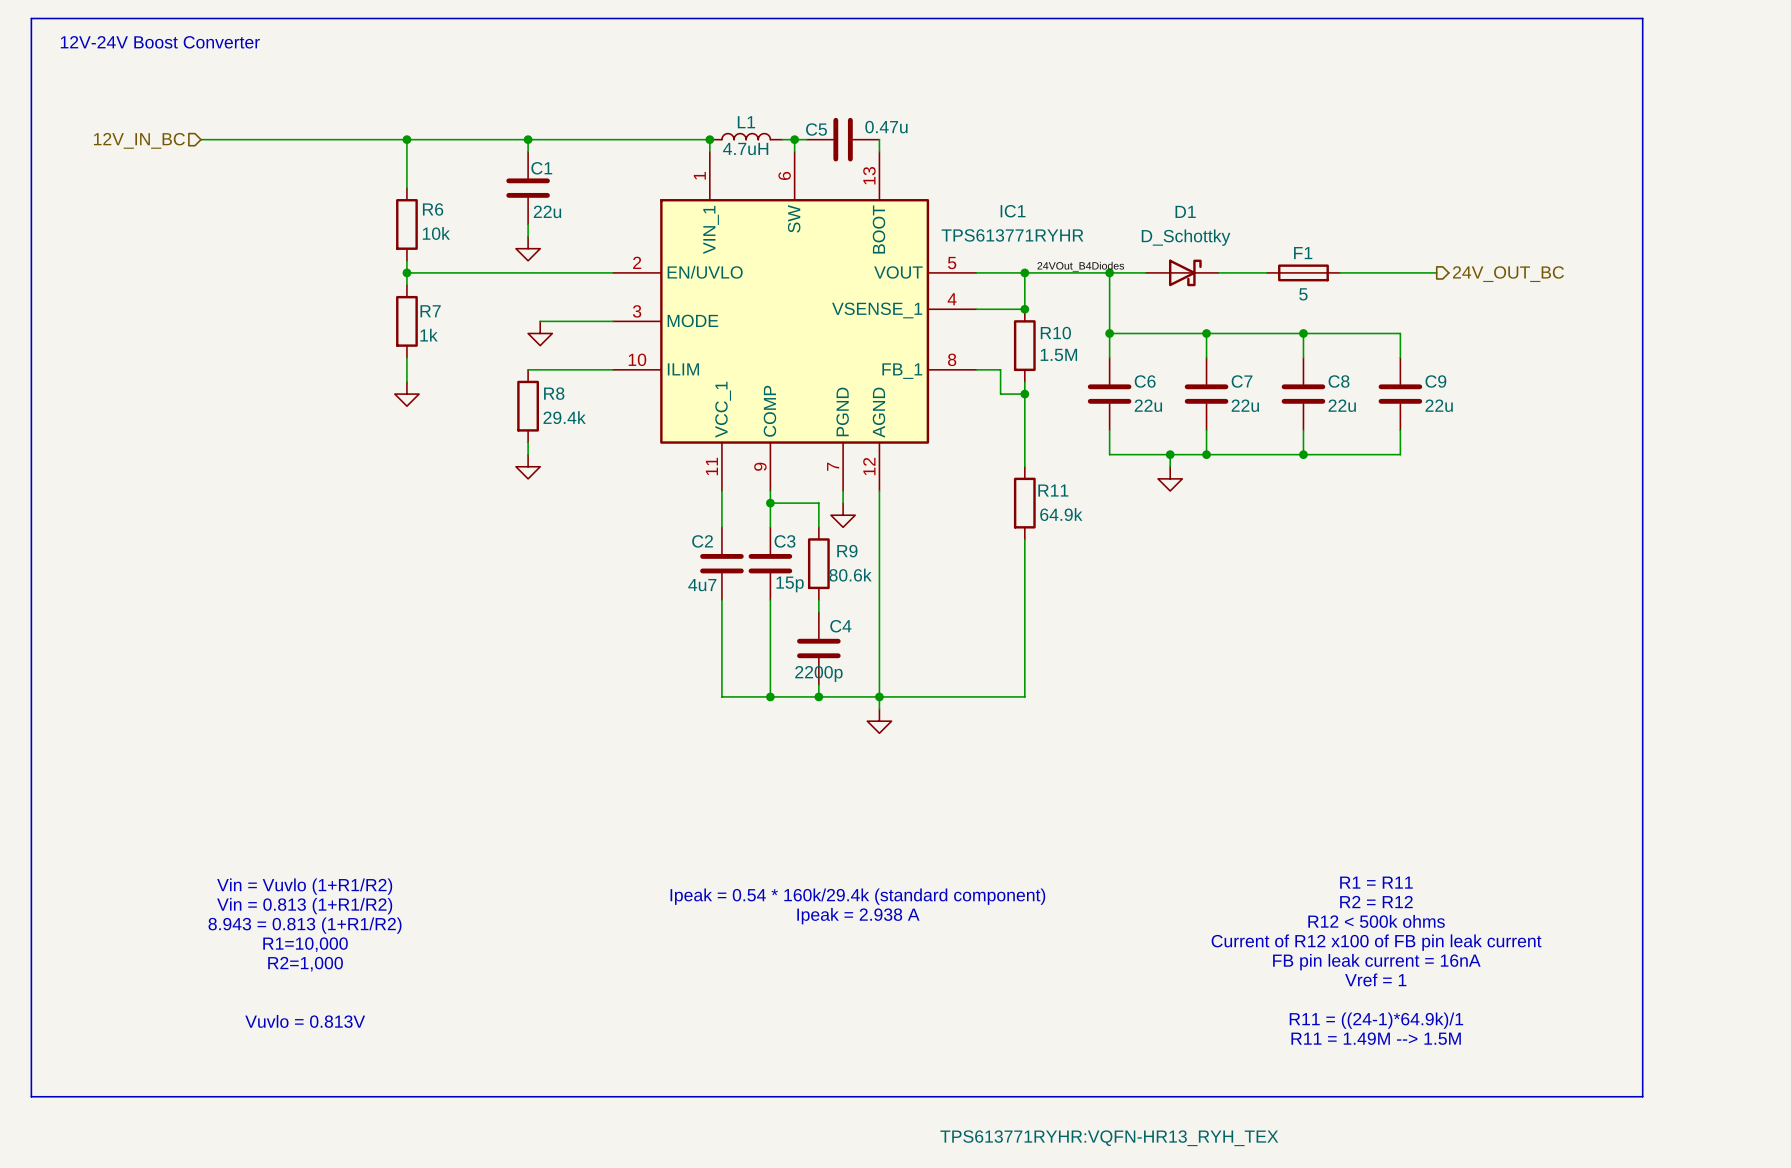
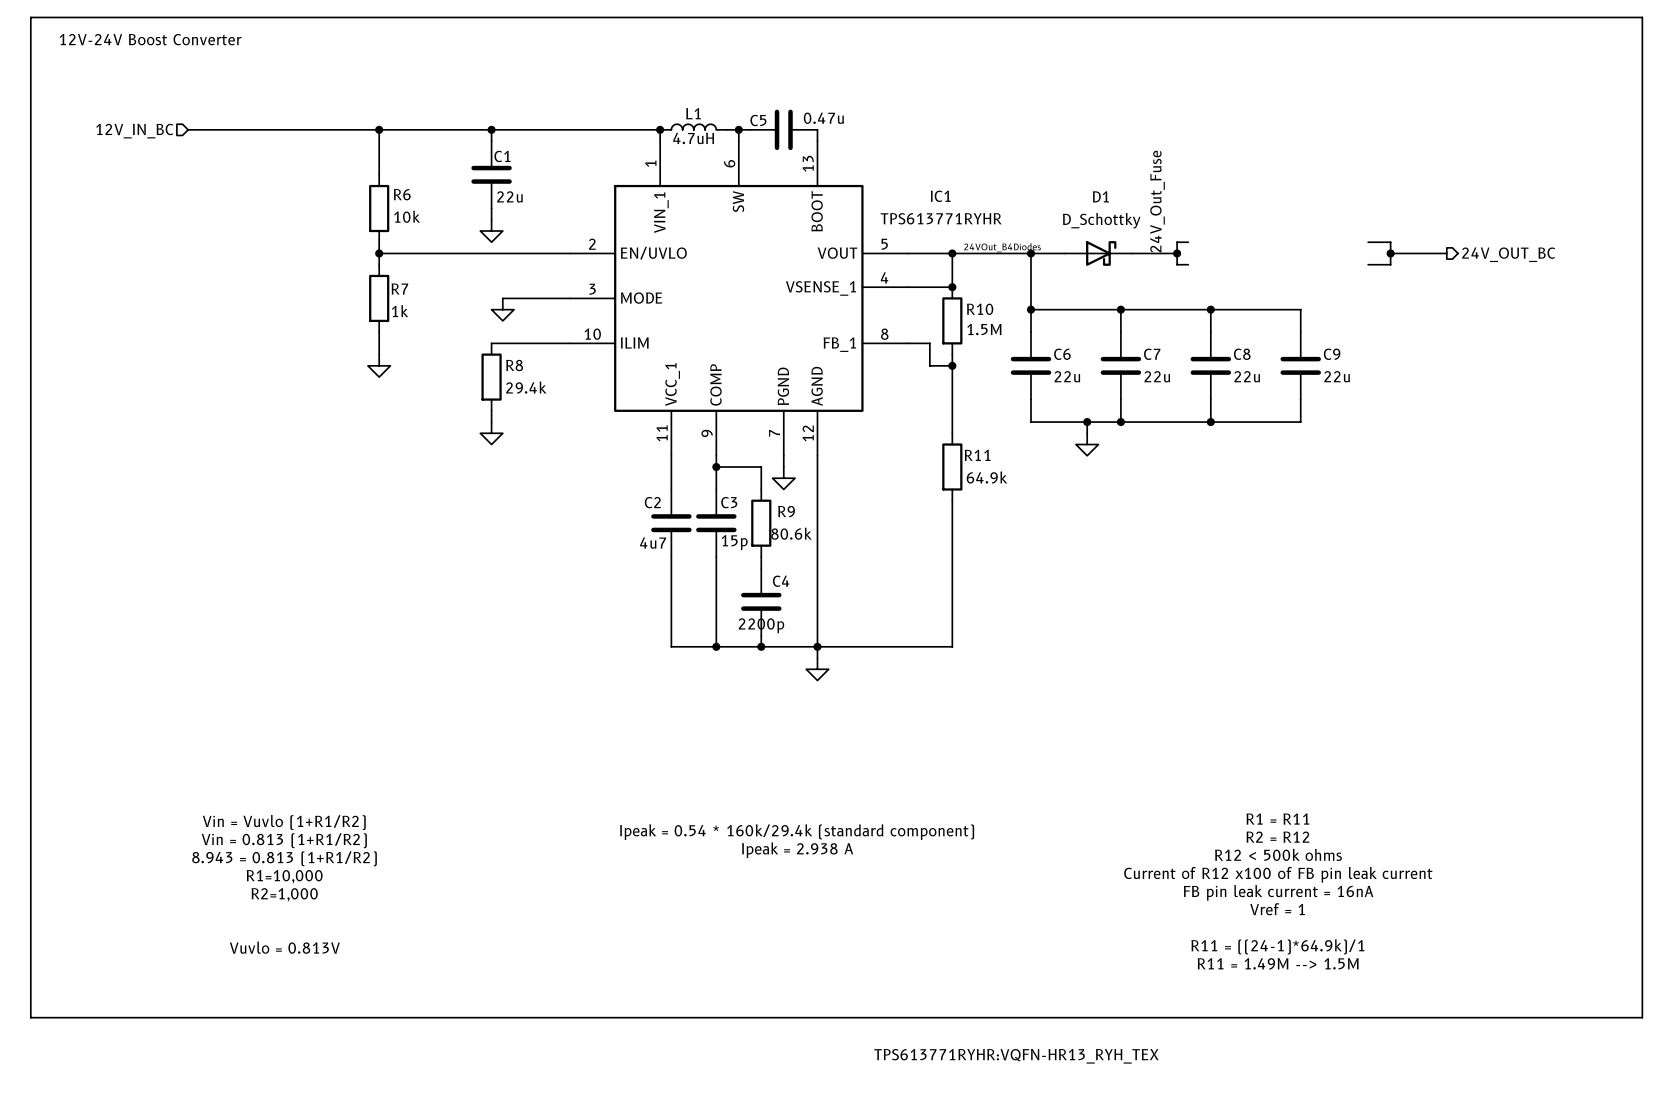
line: (1642, 18) (1642, 1096) -> (1525, 17) (1642, 17) (1642, 1017) (1525, 1017)
label: none -> 24V_Out_Fuse (1157, 201)
wire: none -> (1188, 242) (1177, 242) (1177, 264) (1188, 264)
wire: none -> (1368, 242) (1390, 242) (1390, 264) (1368, 264)
junction: none -> (1177, 253)
F1: 5 (1303, 272) -> none
wire: (1339, 272) (1436, 272) -> none
wire: none -> (1390, 253) (1446, 253)
junction: none -> (1390, 253)
hierarchical label position: 24V_OUT_BC (1508, 274) -> 24V_OUT_BC (1508, 254)

